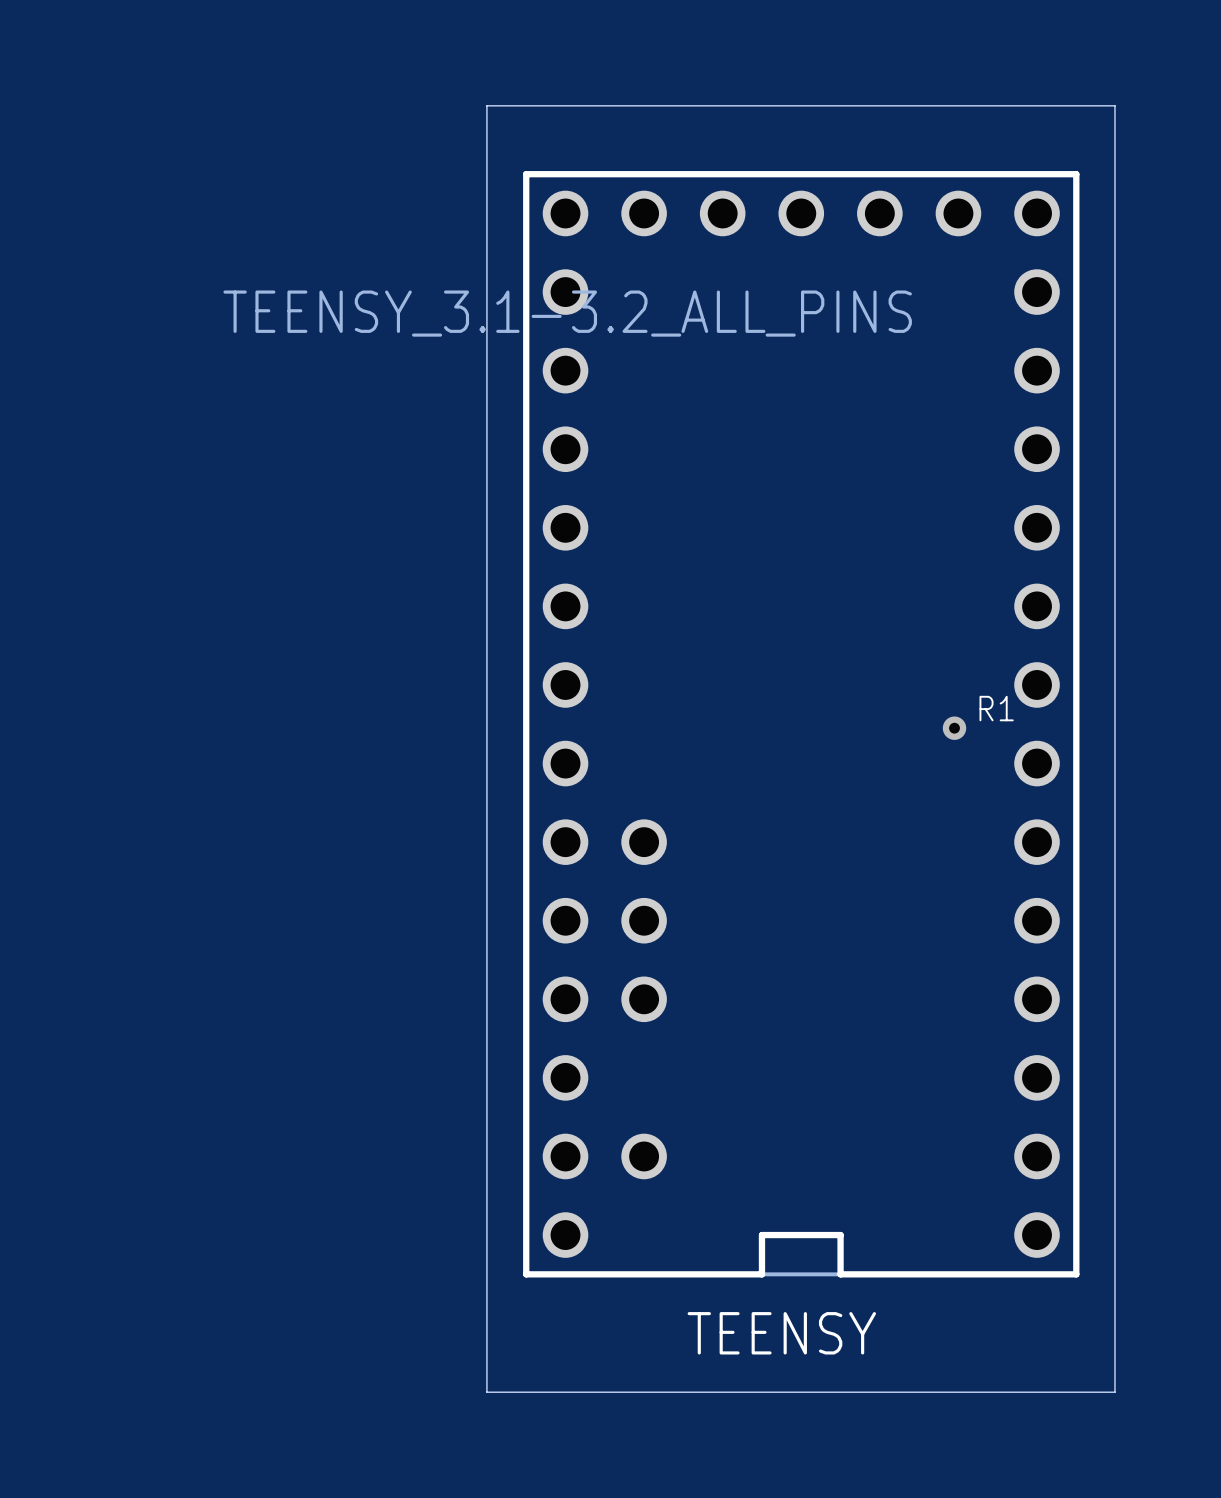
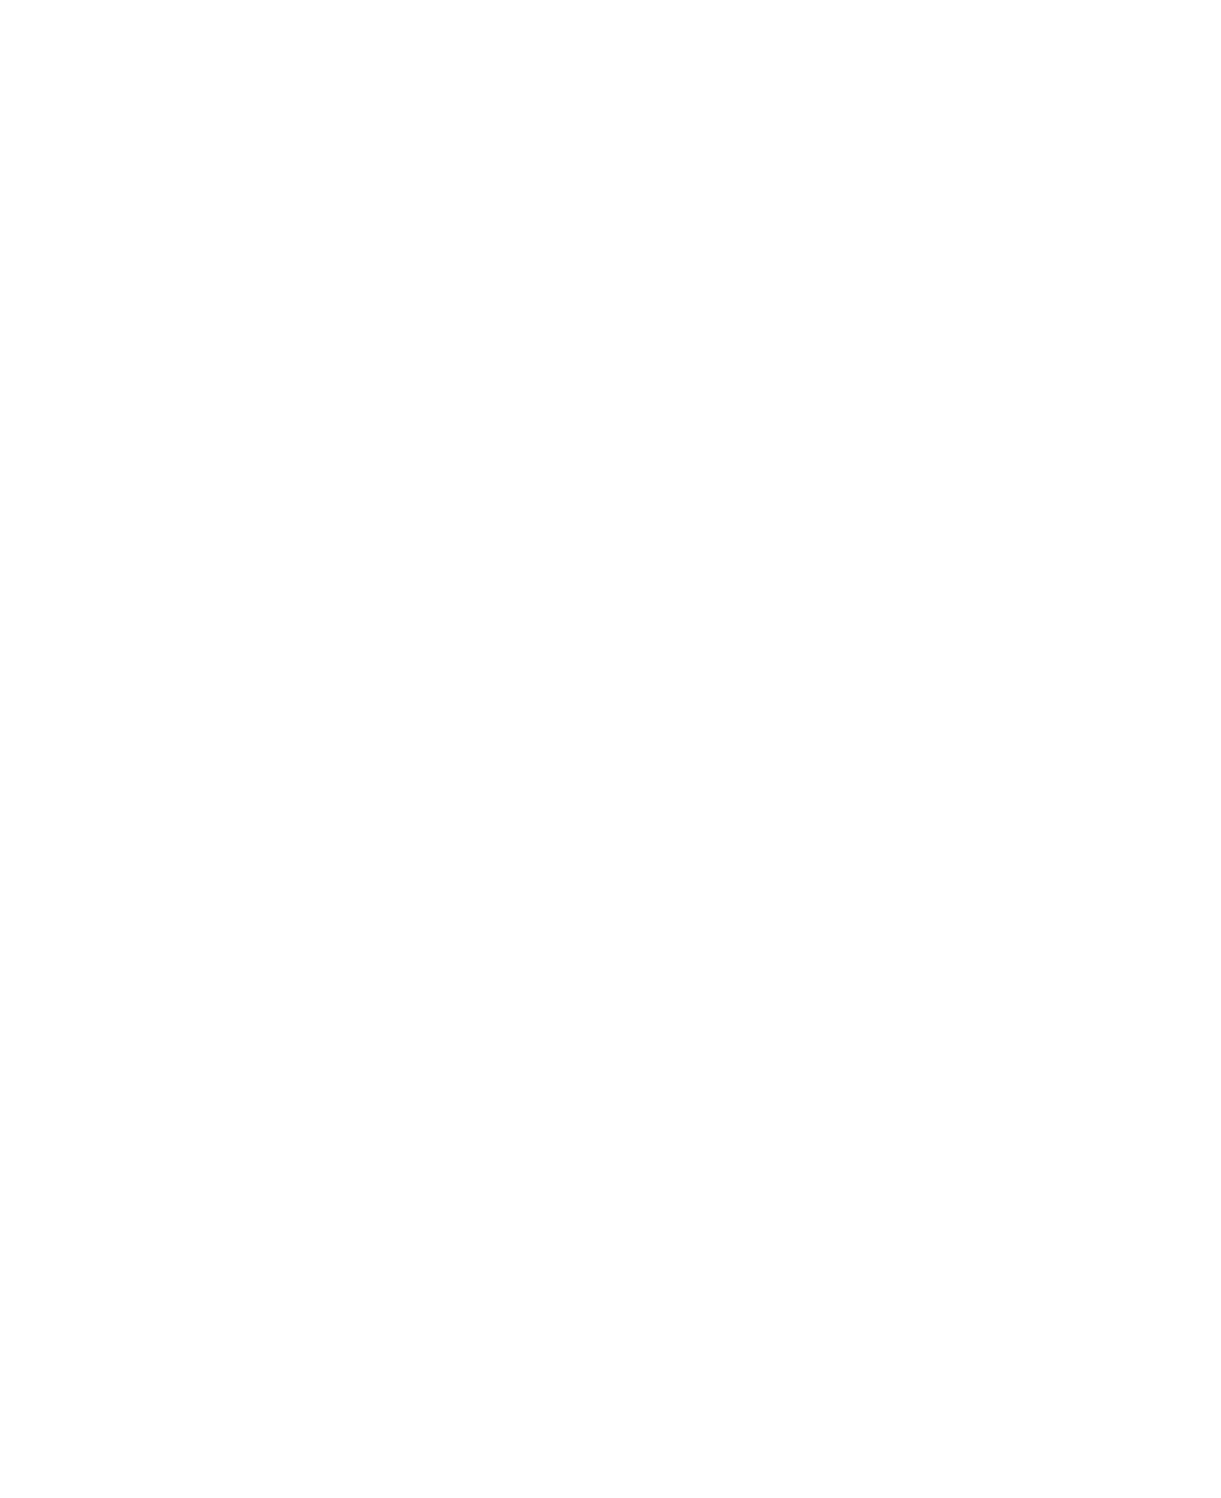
board edge: (486, 105) (1114, 105) (1114, 1392) (486, 1392) (486, 105) -> none
text: R1 (996, 708) -> none
TEENSY: TEENSY_3.1-3.2_ALL_PINS (801, 724) -> none
via: (954, 728) -> none

